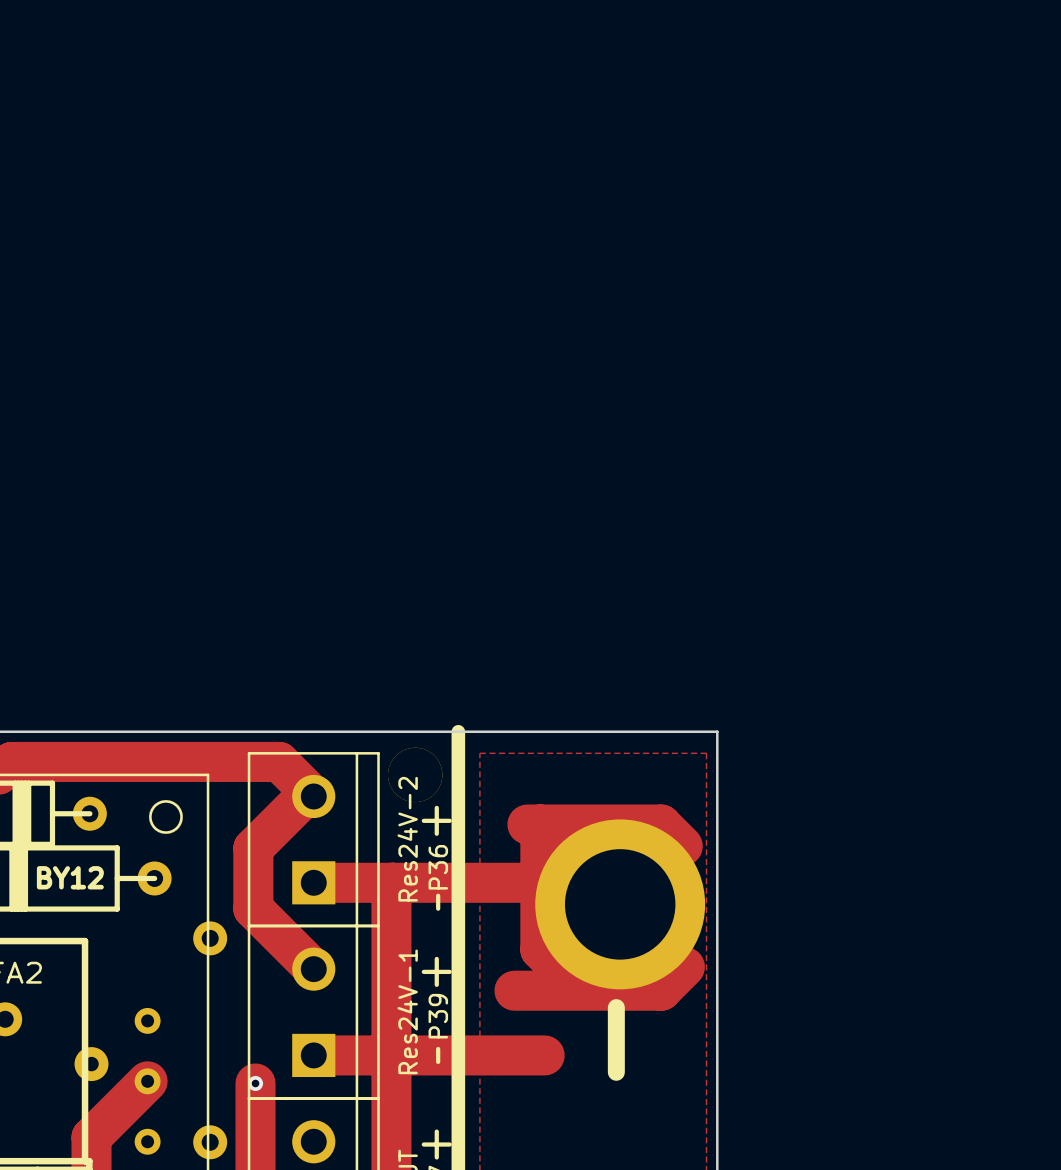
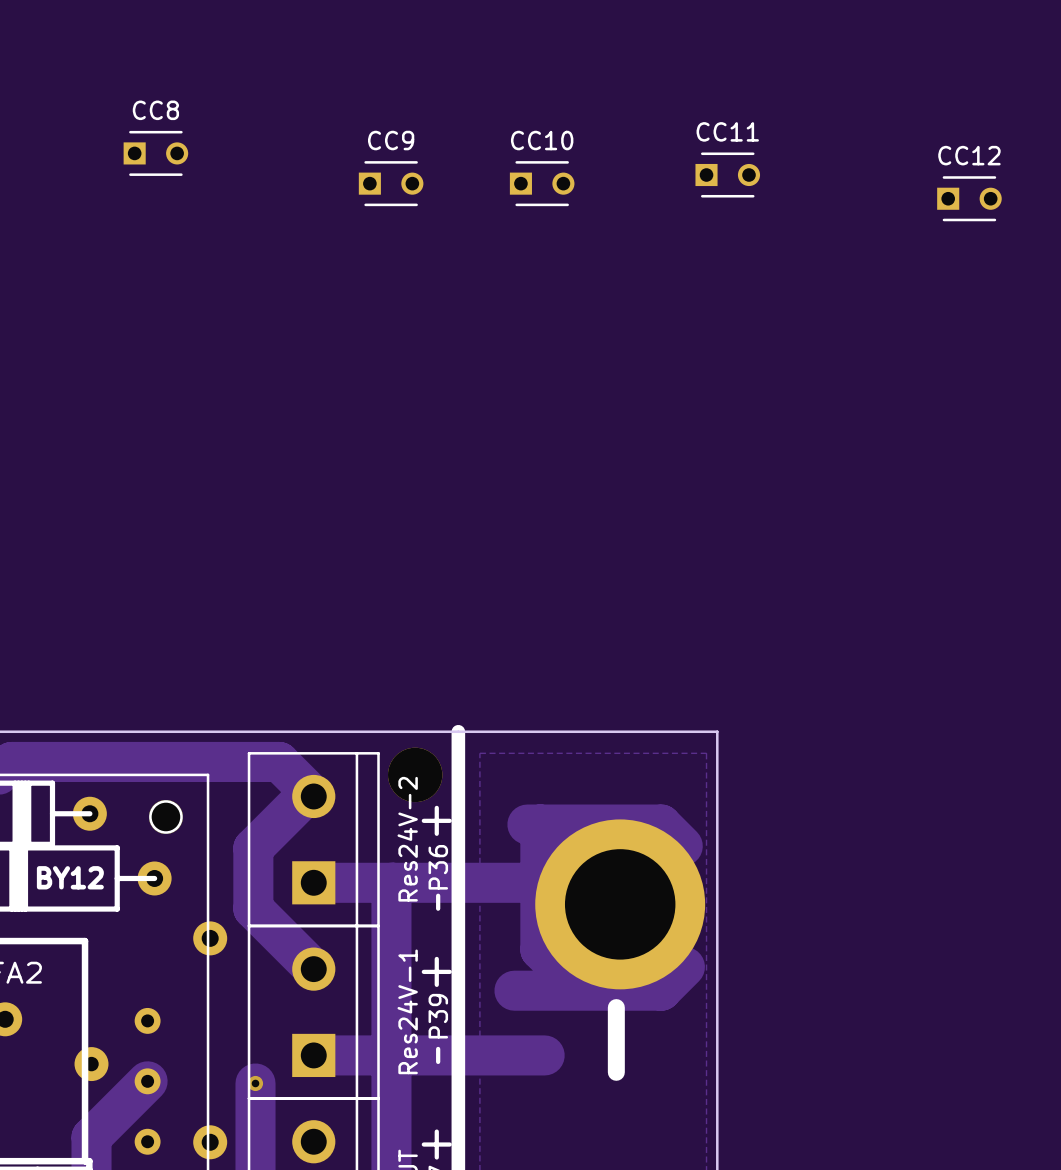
CC8: none -> (155, 153)
CC11: none -> (727, 175)
CC9: none -> (391, 183)
CC10: none -> (542, 183)
CC12: none -> (969, 198)

